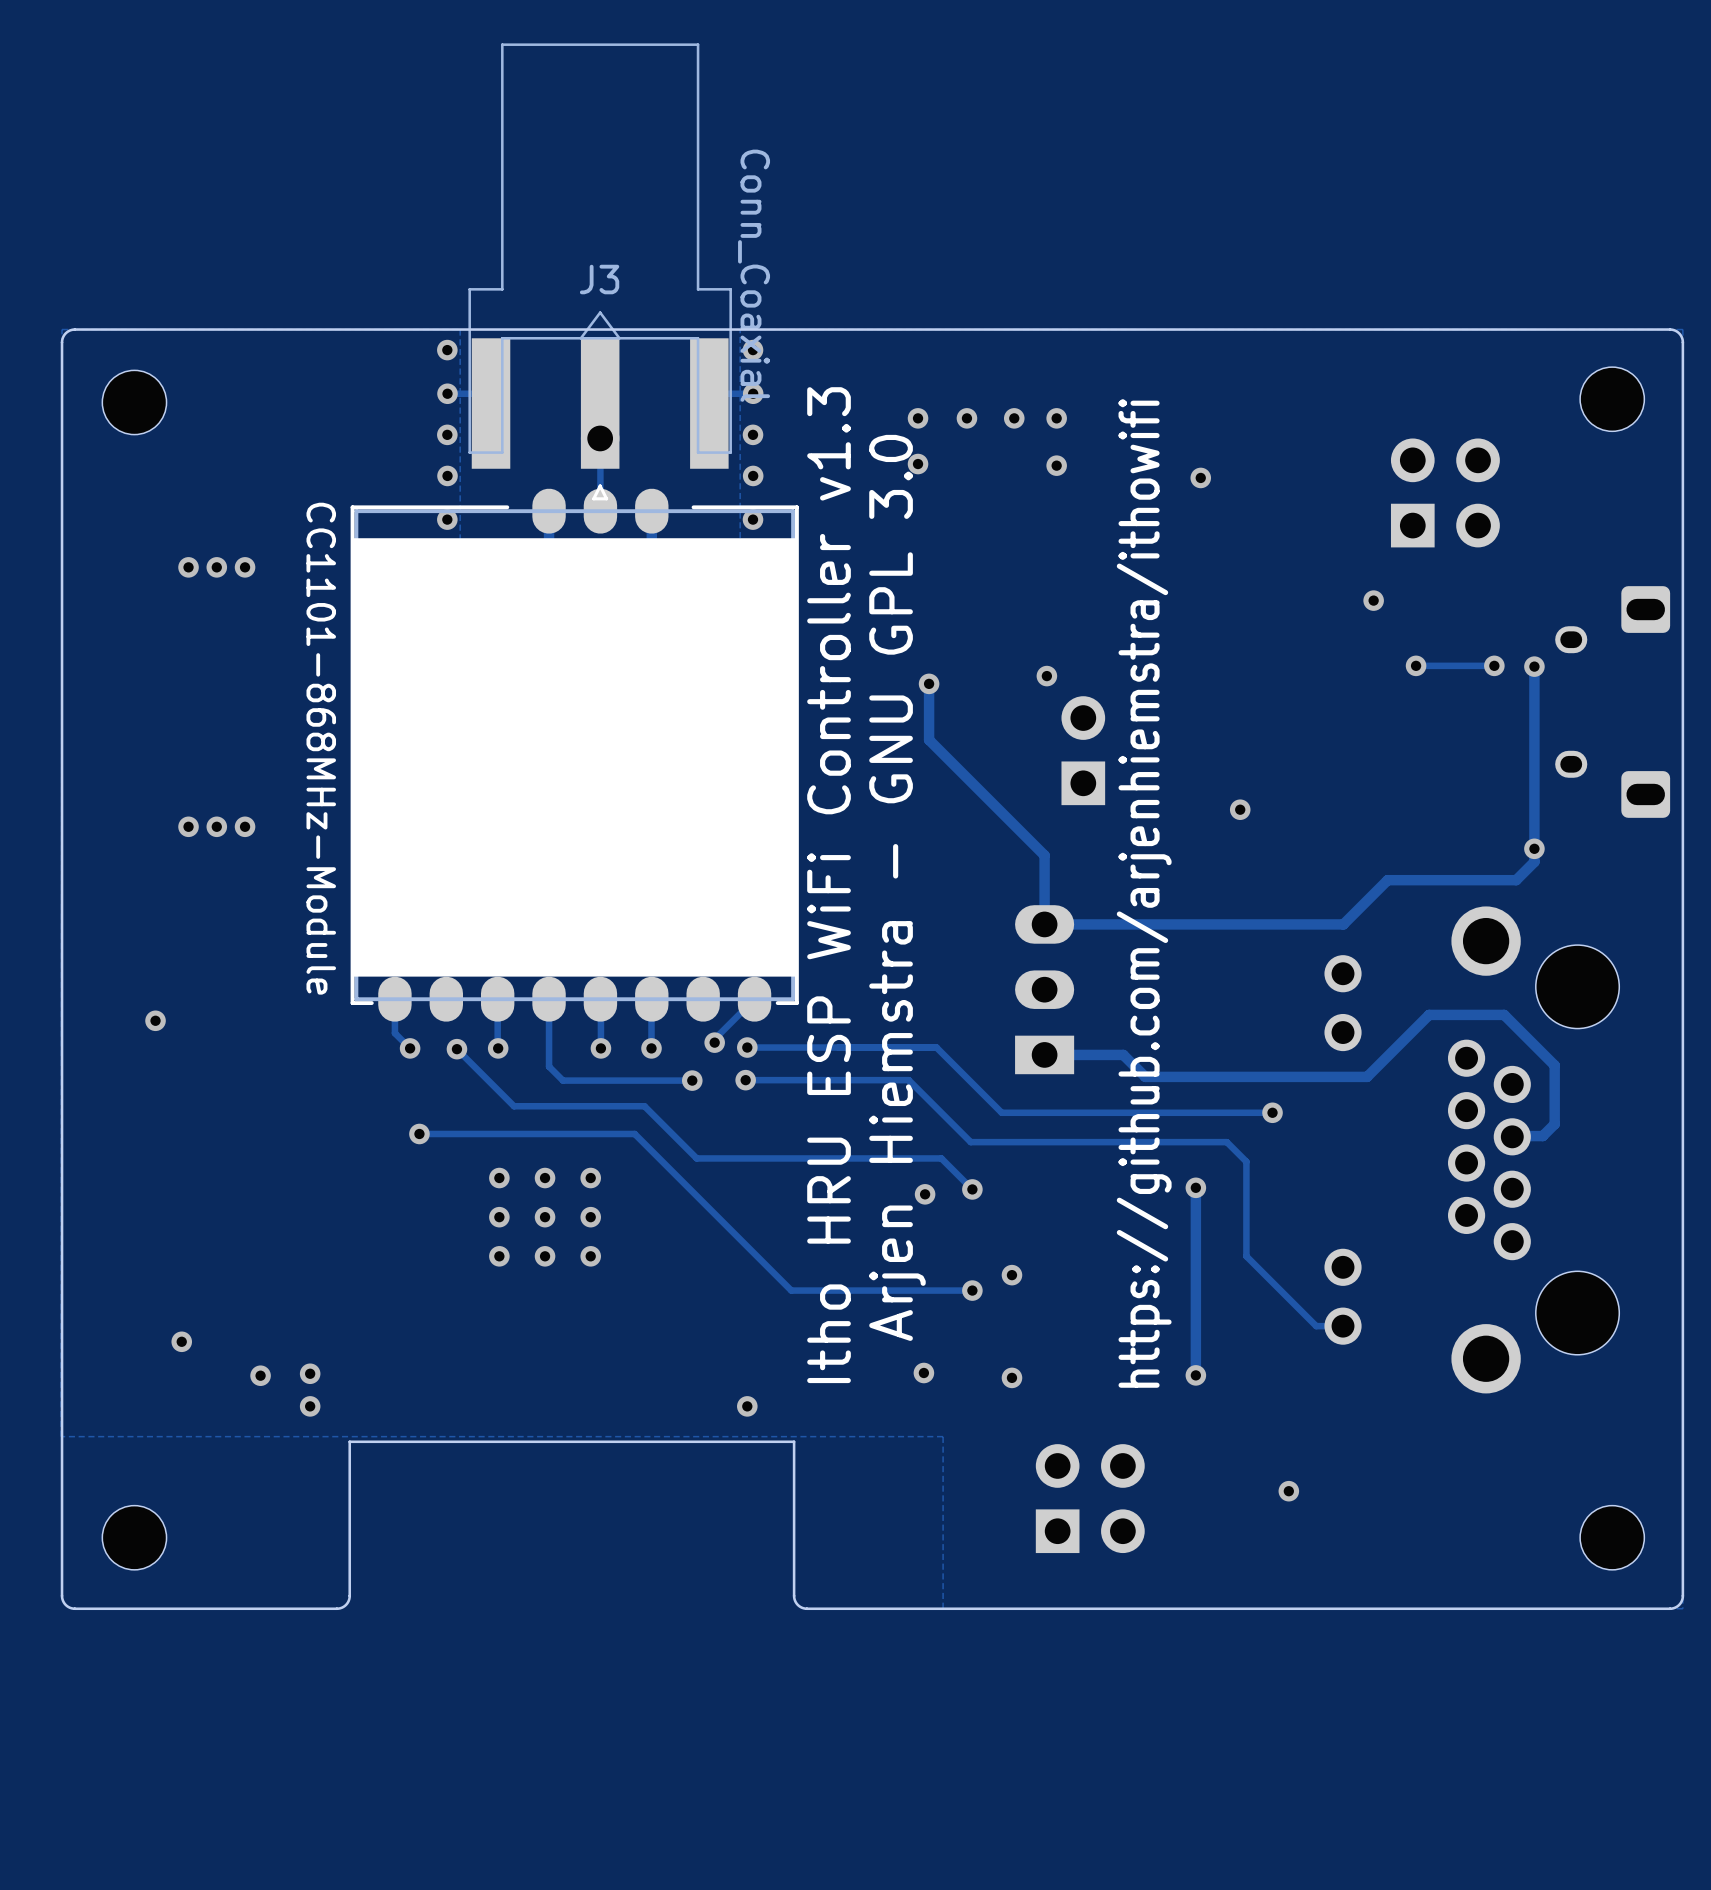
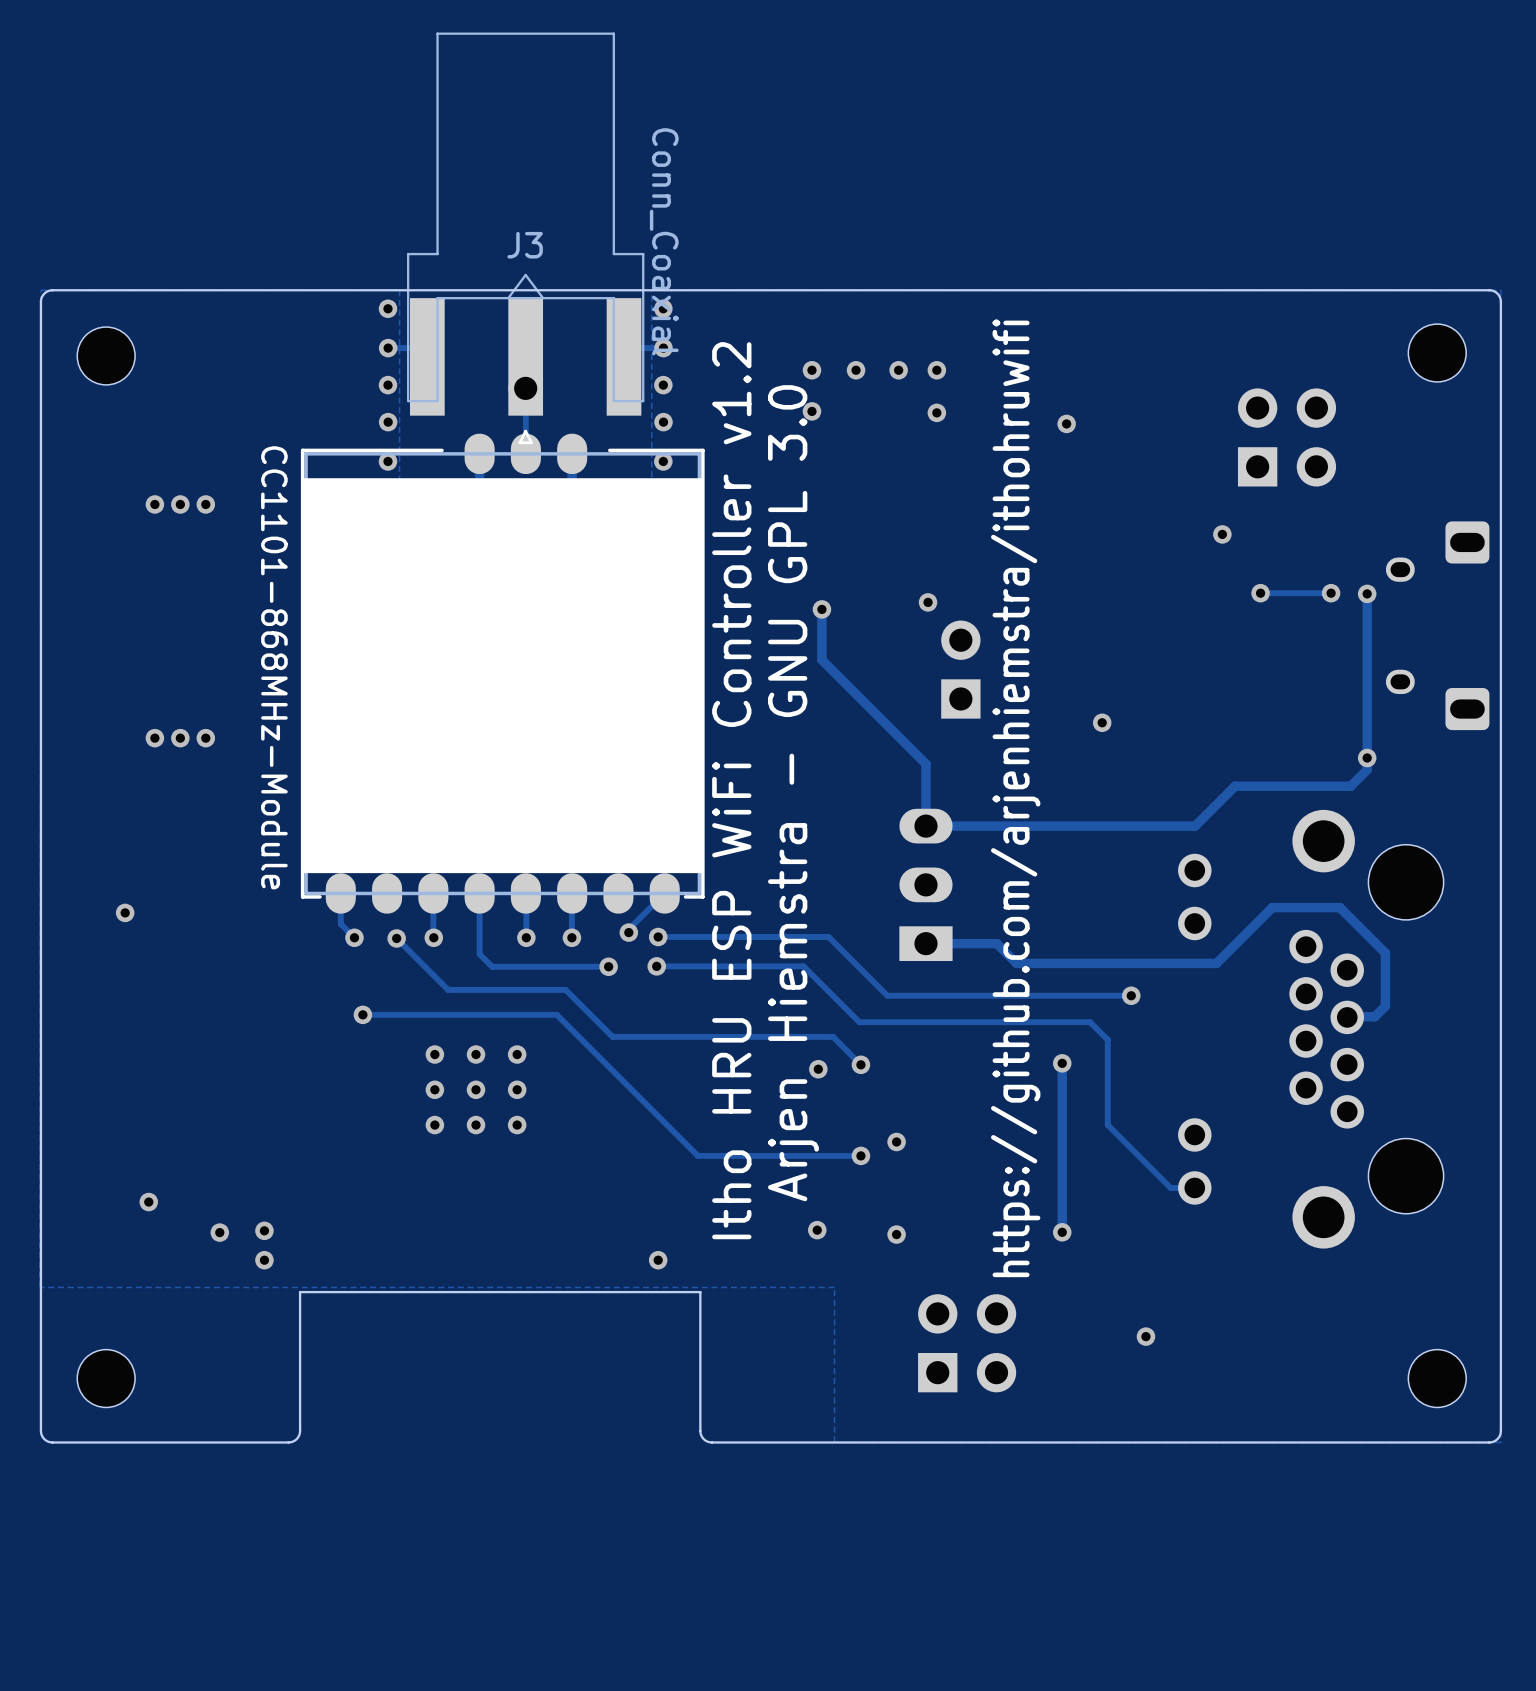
text: Itho HRU ESP WiFi Controller v1.3 (829, 885) -> Itho HRU ESP WiFi Controller v1.2 (731, 790)
text: https://github.com/arjenhiemstra/ithowifi (1144, 893) -> https://github.com/arjenhiemstra/ithohruwifi (1015, 798)

